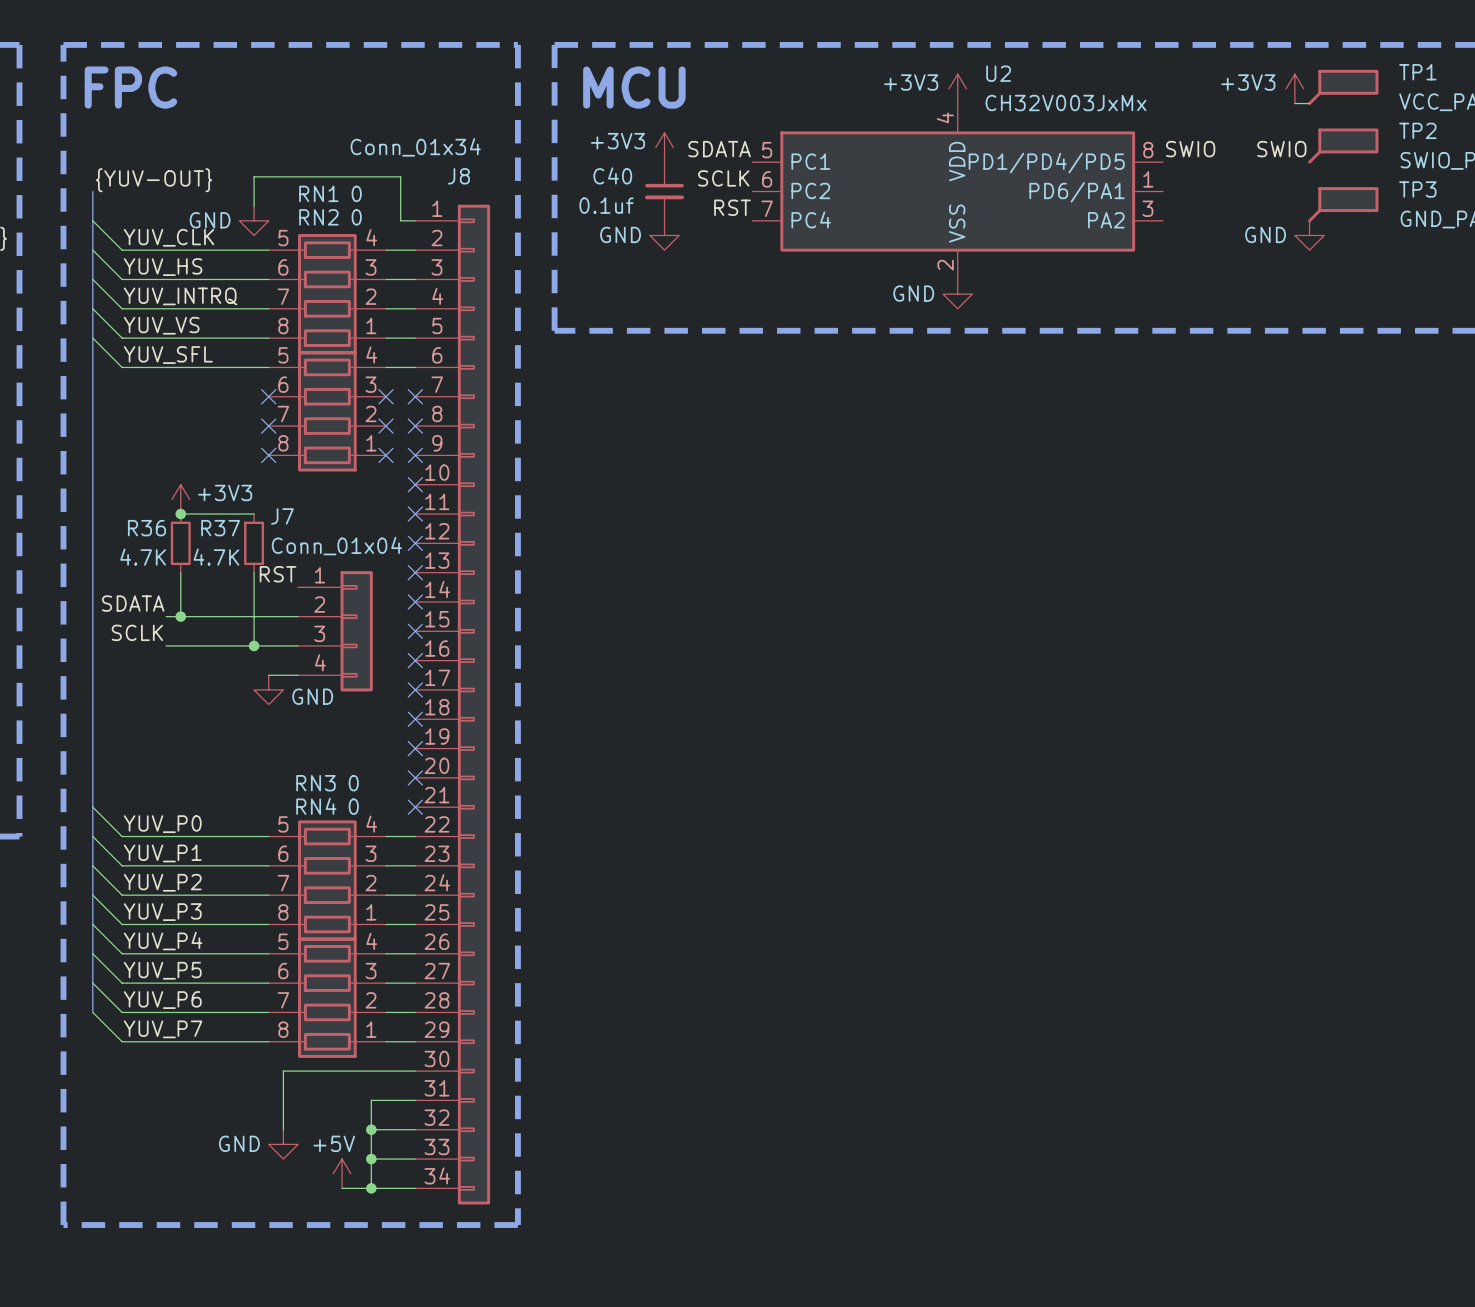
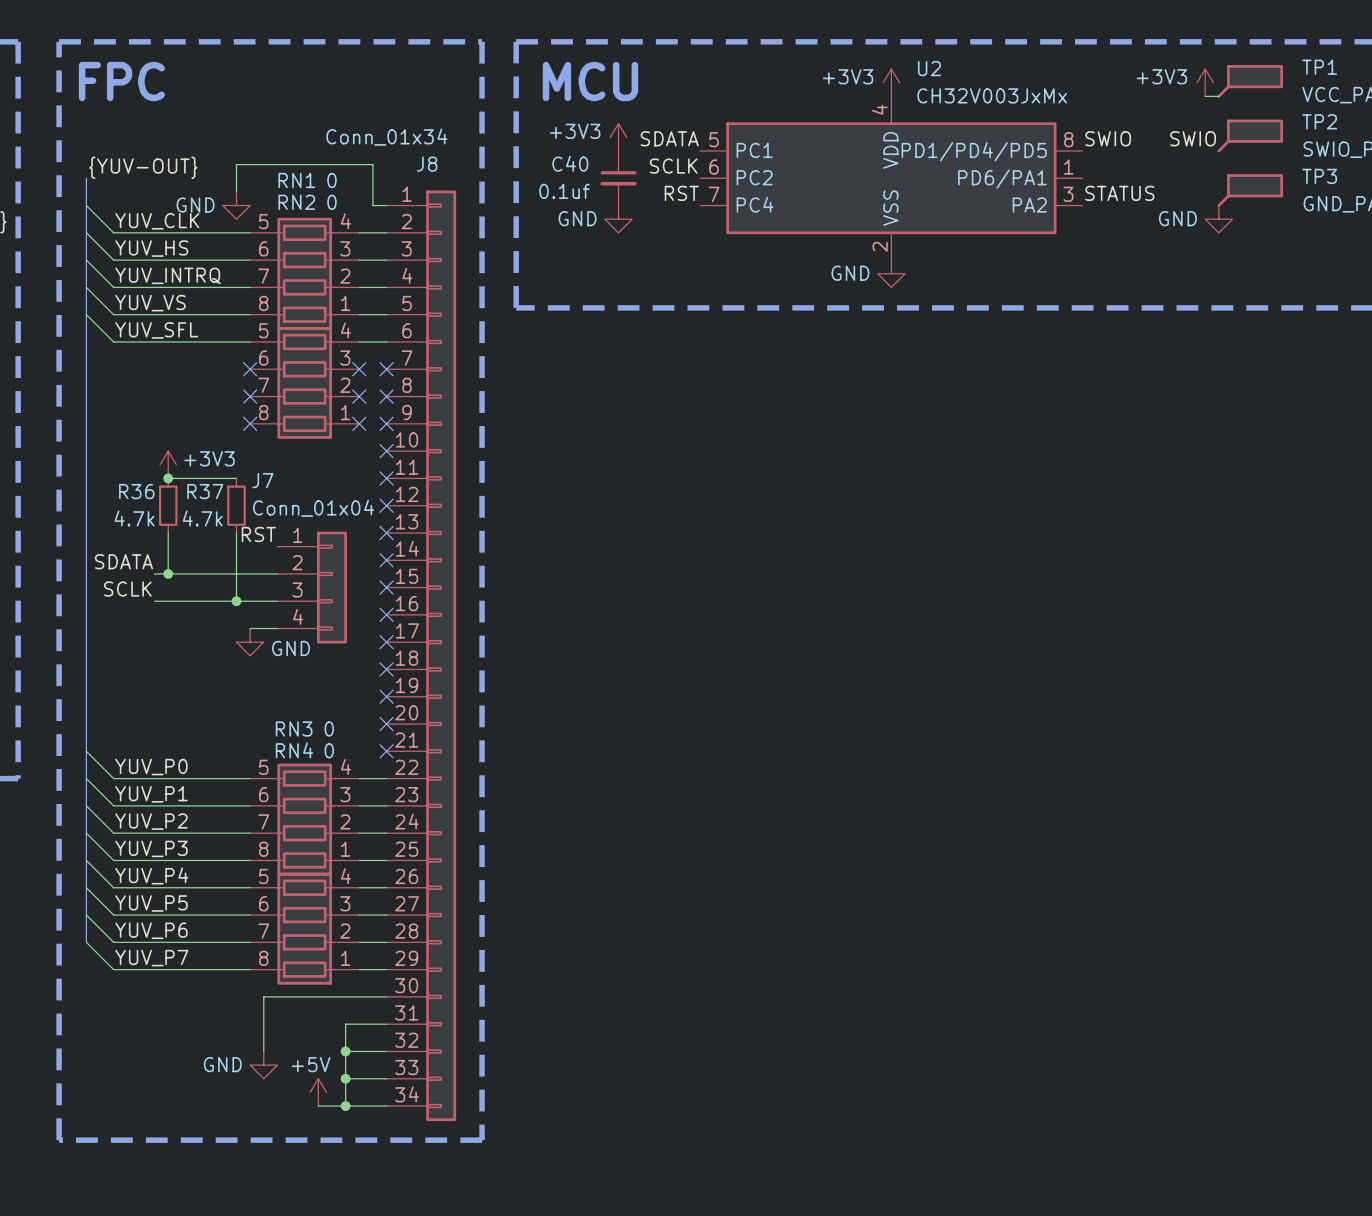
label: none -> STATUS (1119, 193)
R36 value: 4.7K (143, 557) -> 4.7k (134, 518)
R37 value: 4.7K (216, 557) -> 4.7k (202, 518)

